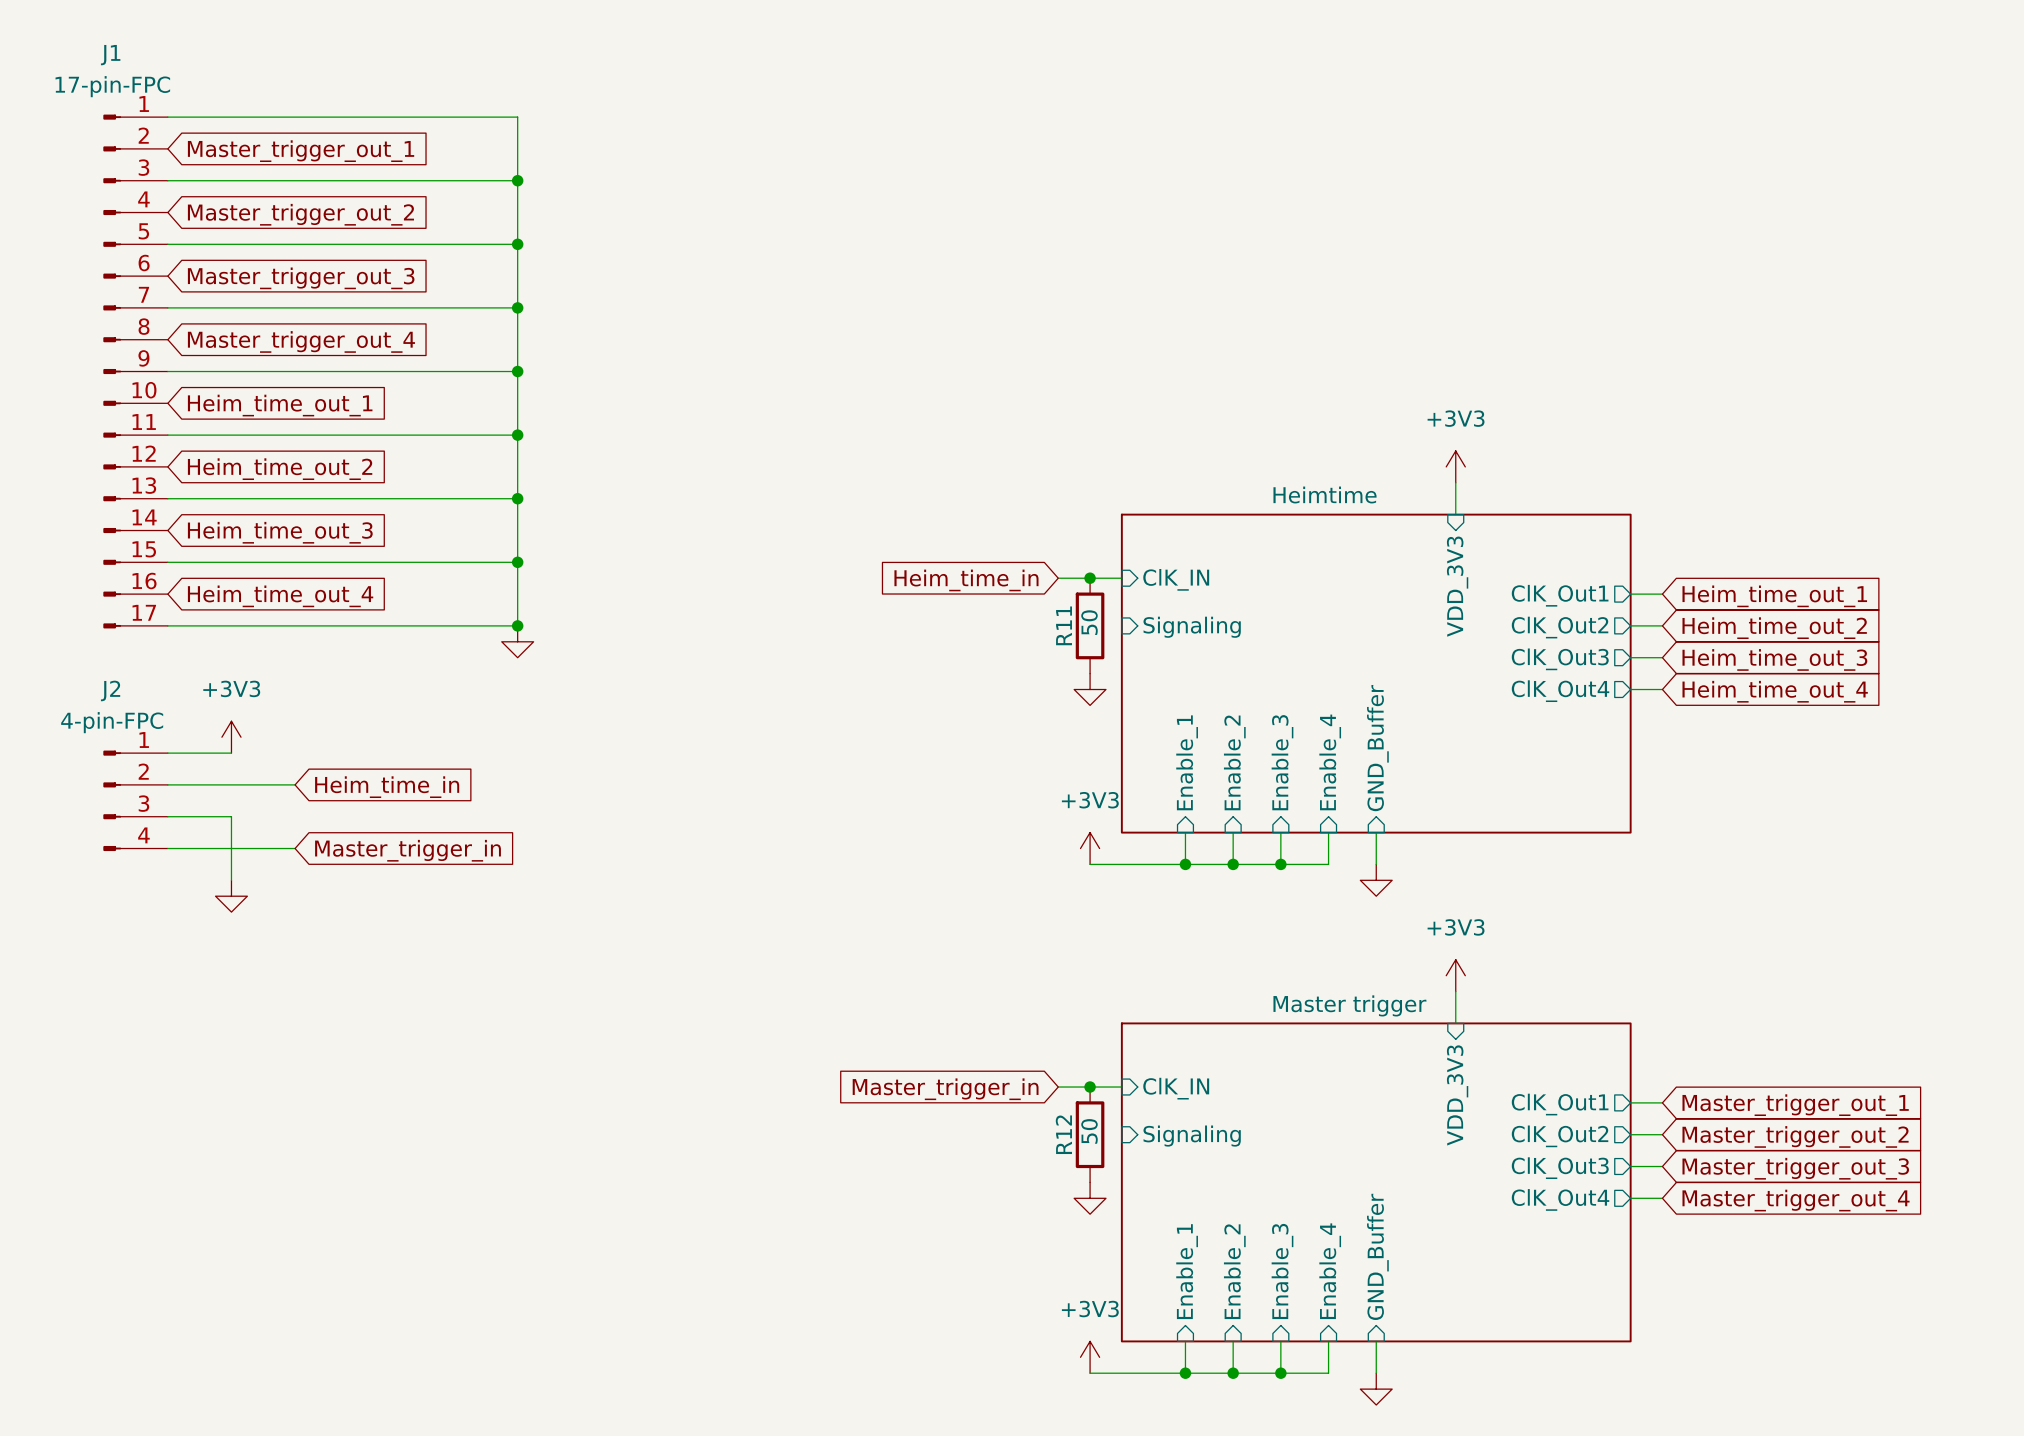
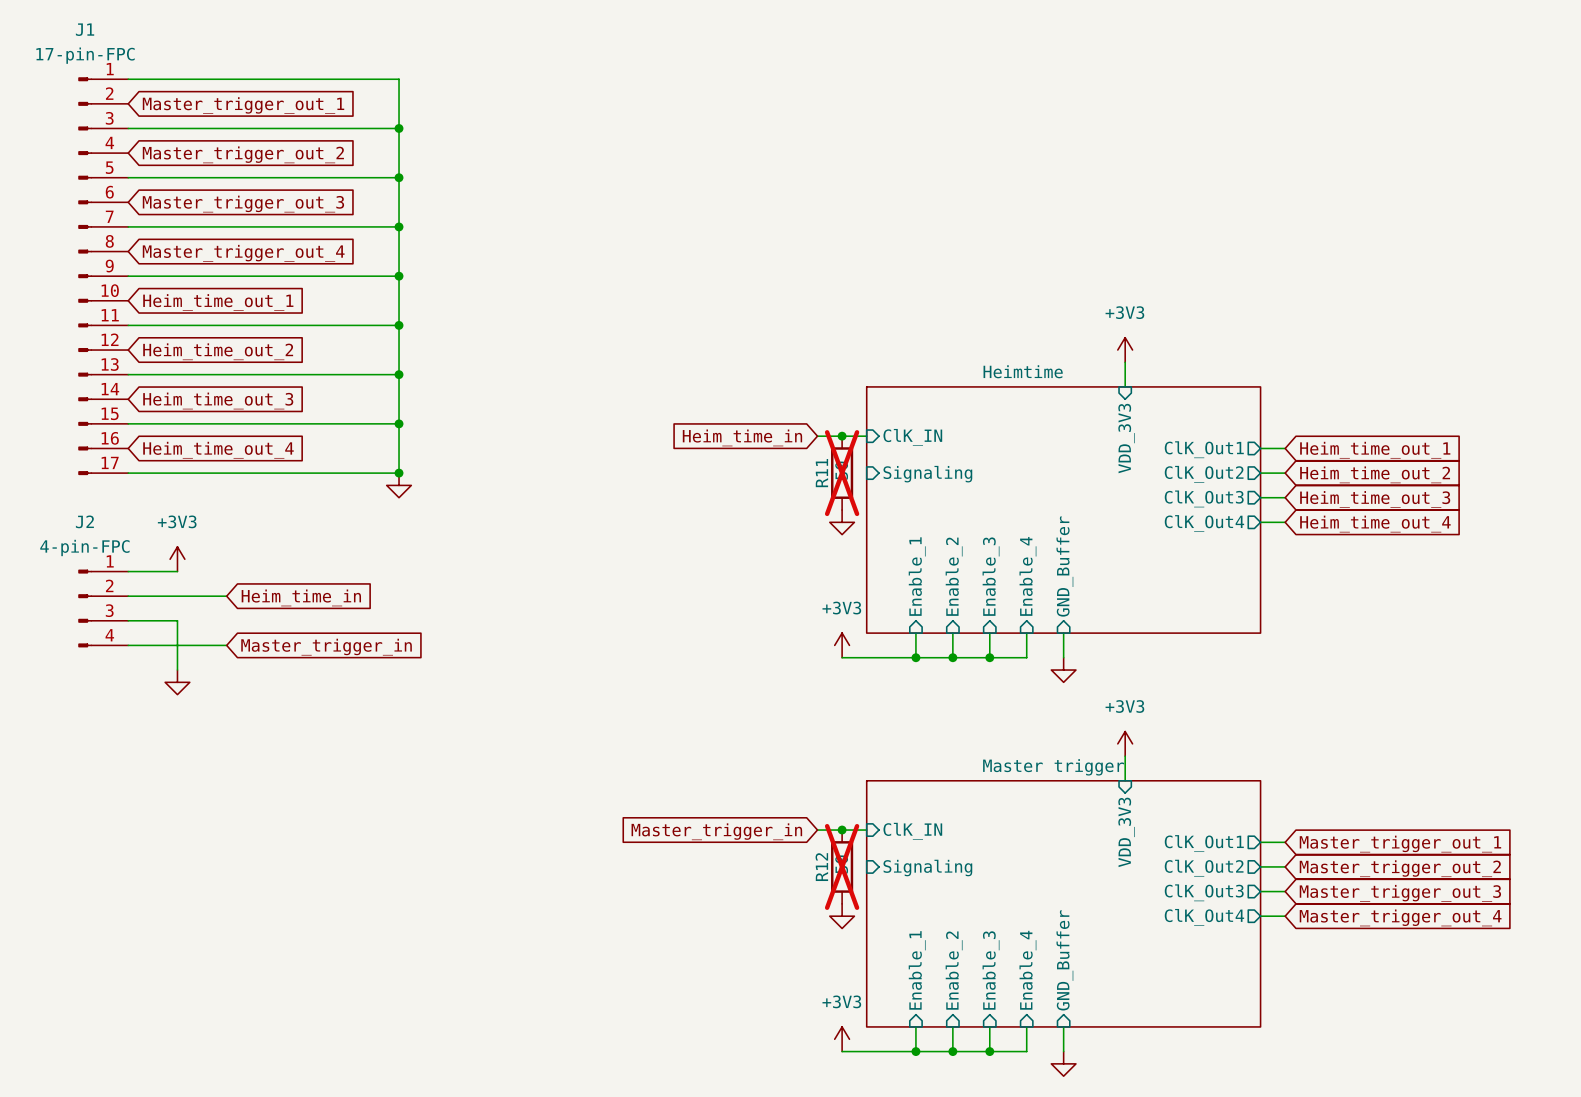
R11 do-not-place cross: none -> (842, 473)
R12 do-not-place cross: none -> (842, 866)

